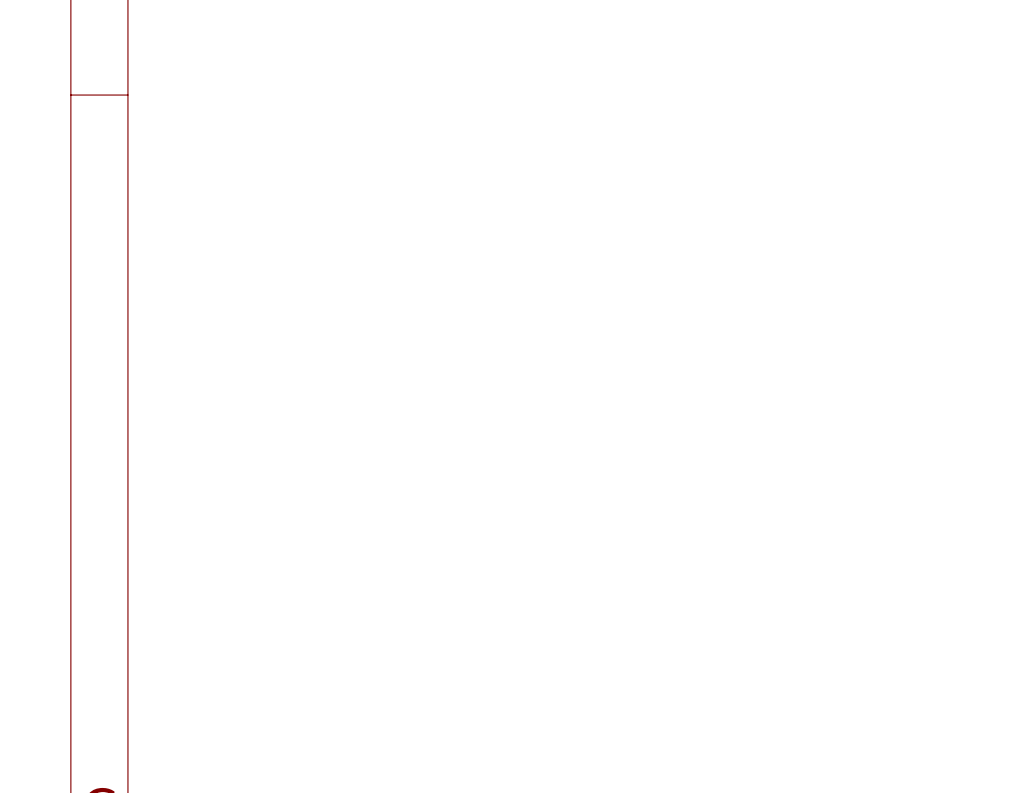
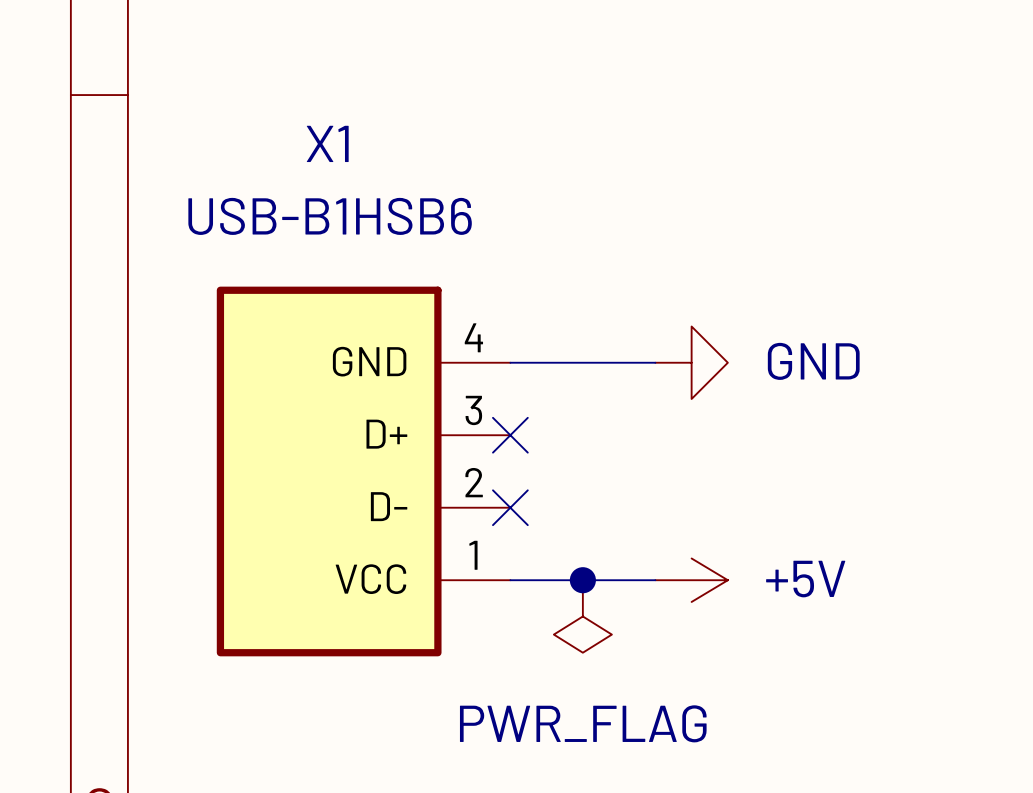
wire: none -> (510, 362) (655, 362)
power symbol: none -> GND (691, 362)
no-connect mark: none -> (510, 435)
X1: none -> USB-B1HSB6 (363, 471)
no-connect mark: none -> (510, 507)
wire: none -> (510, 580) (655, 580)
junction: none -> (582, 580)
power symbol: none -> +5V (691, 580)
power symbol: none -> PWR_FLAG (582, 616)

